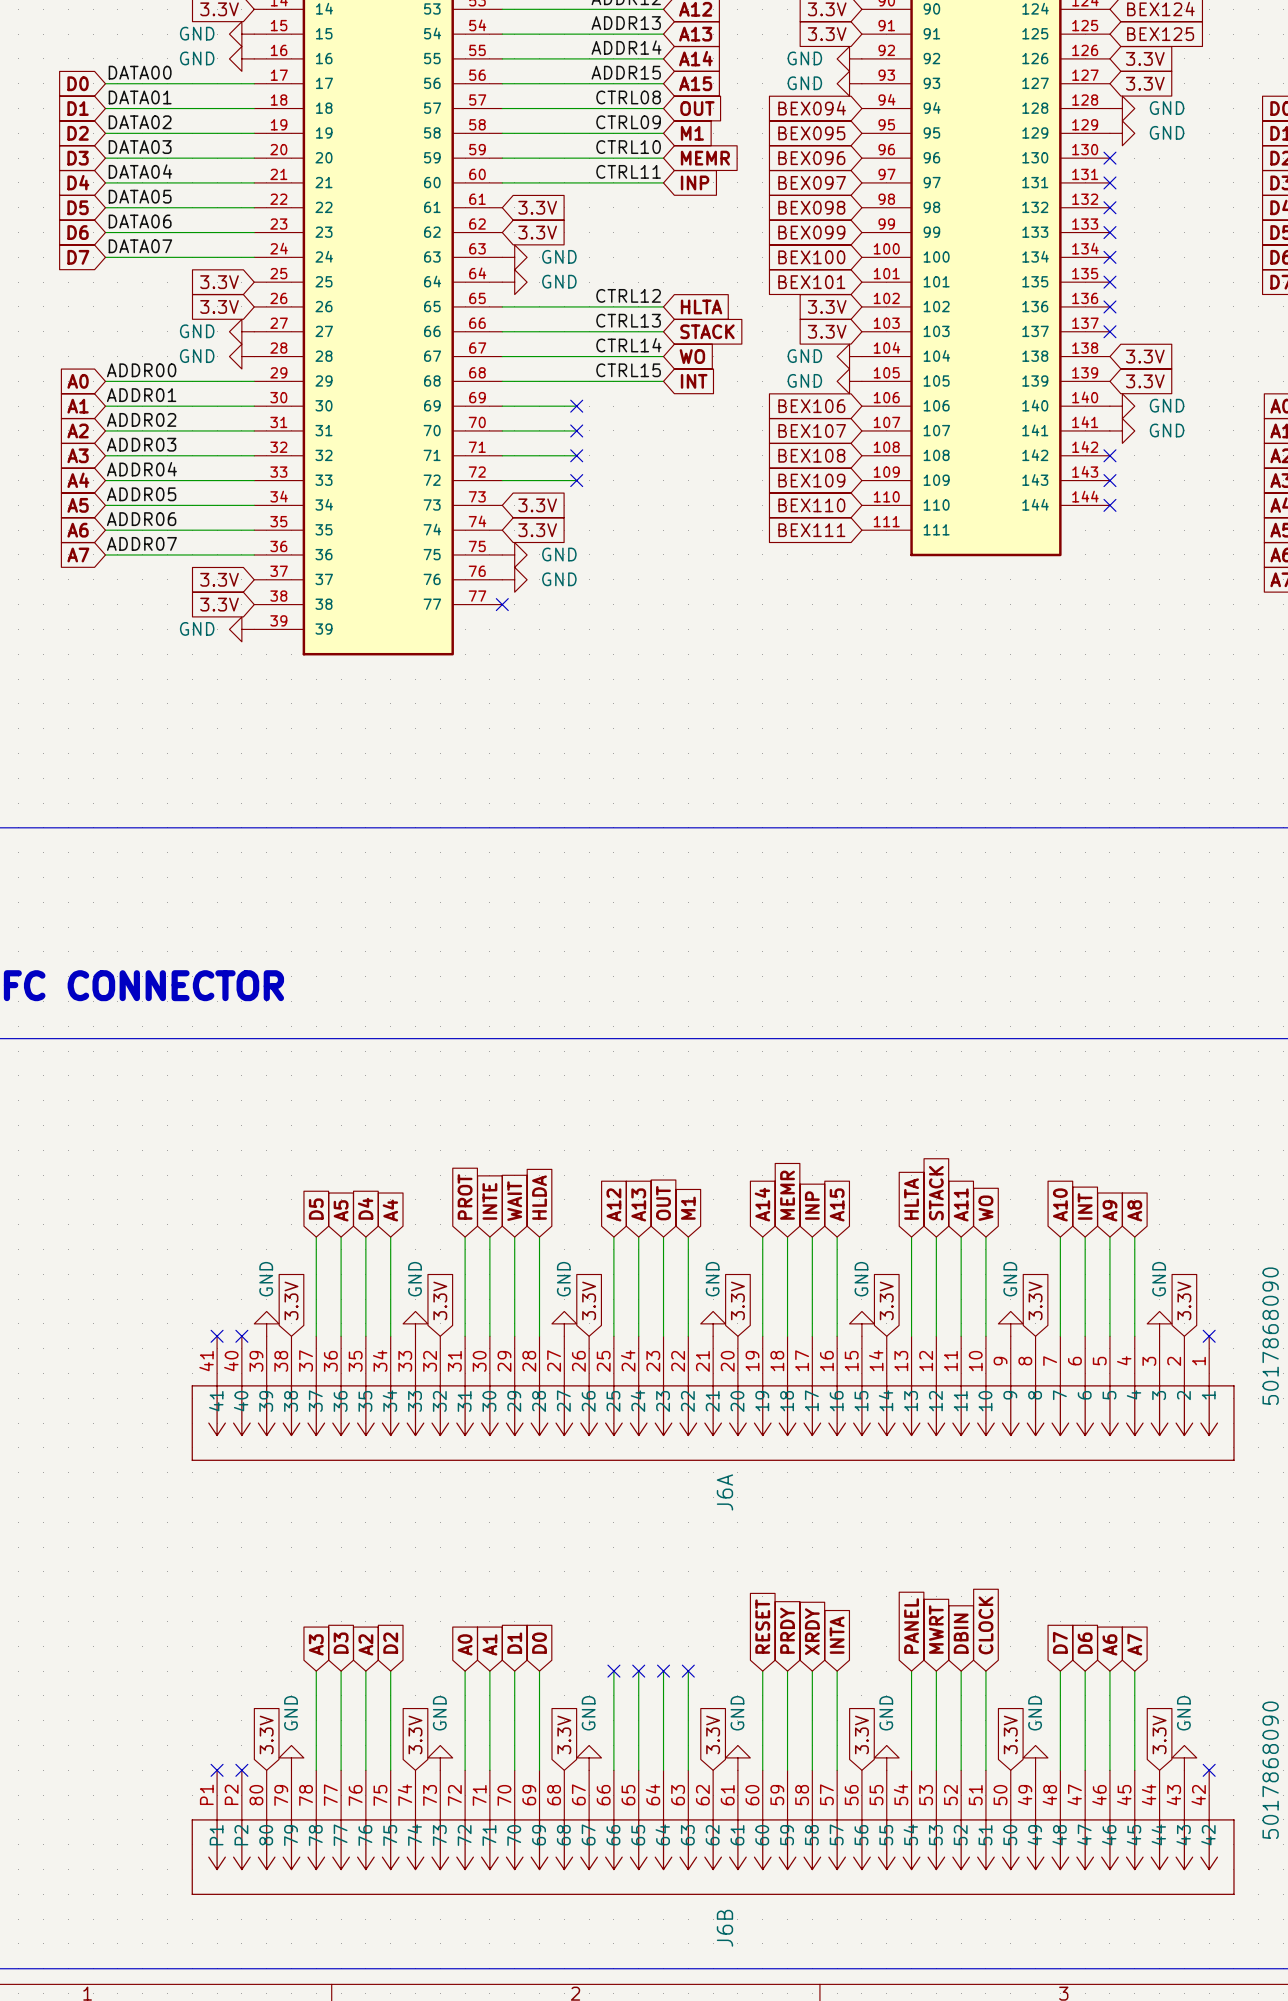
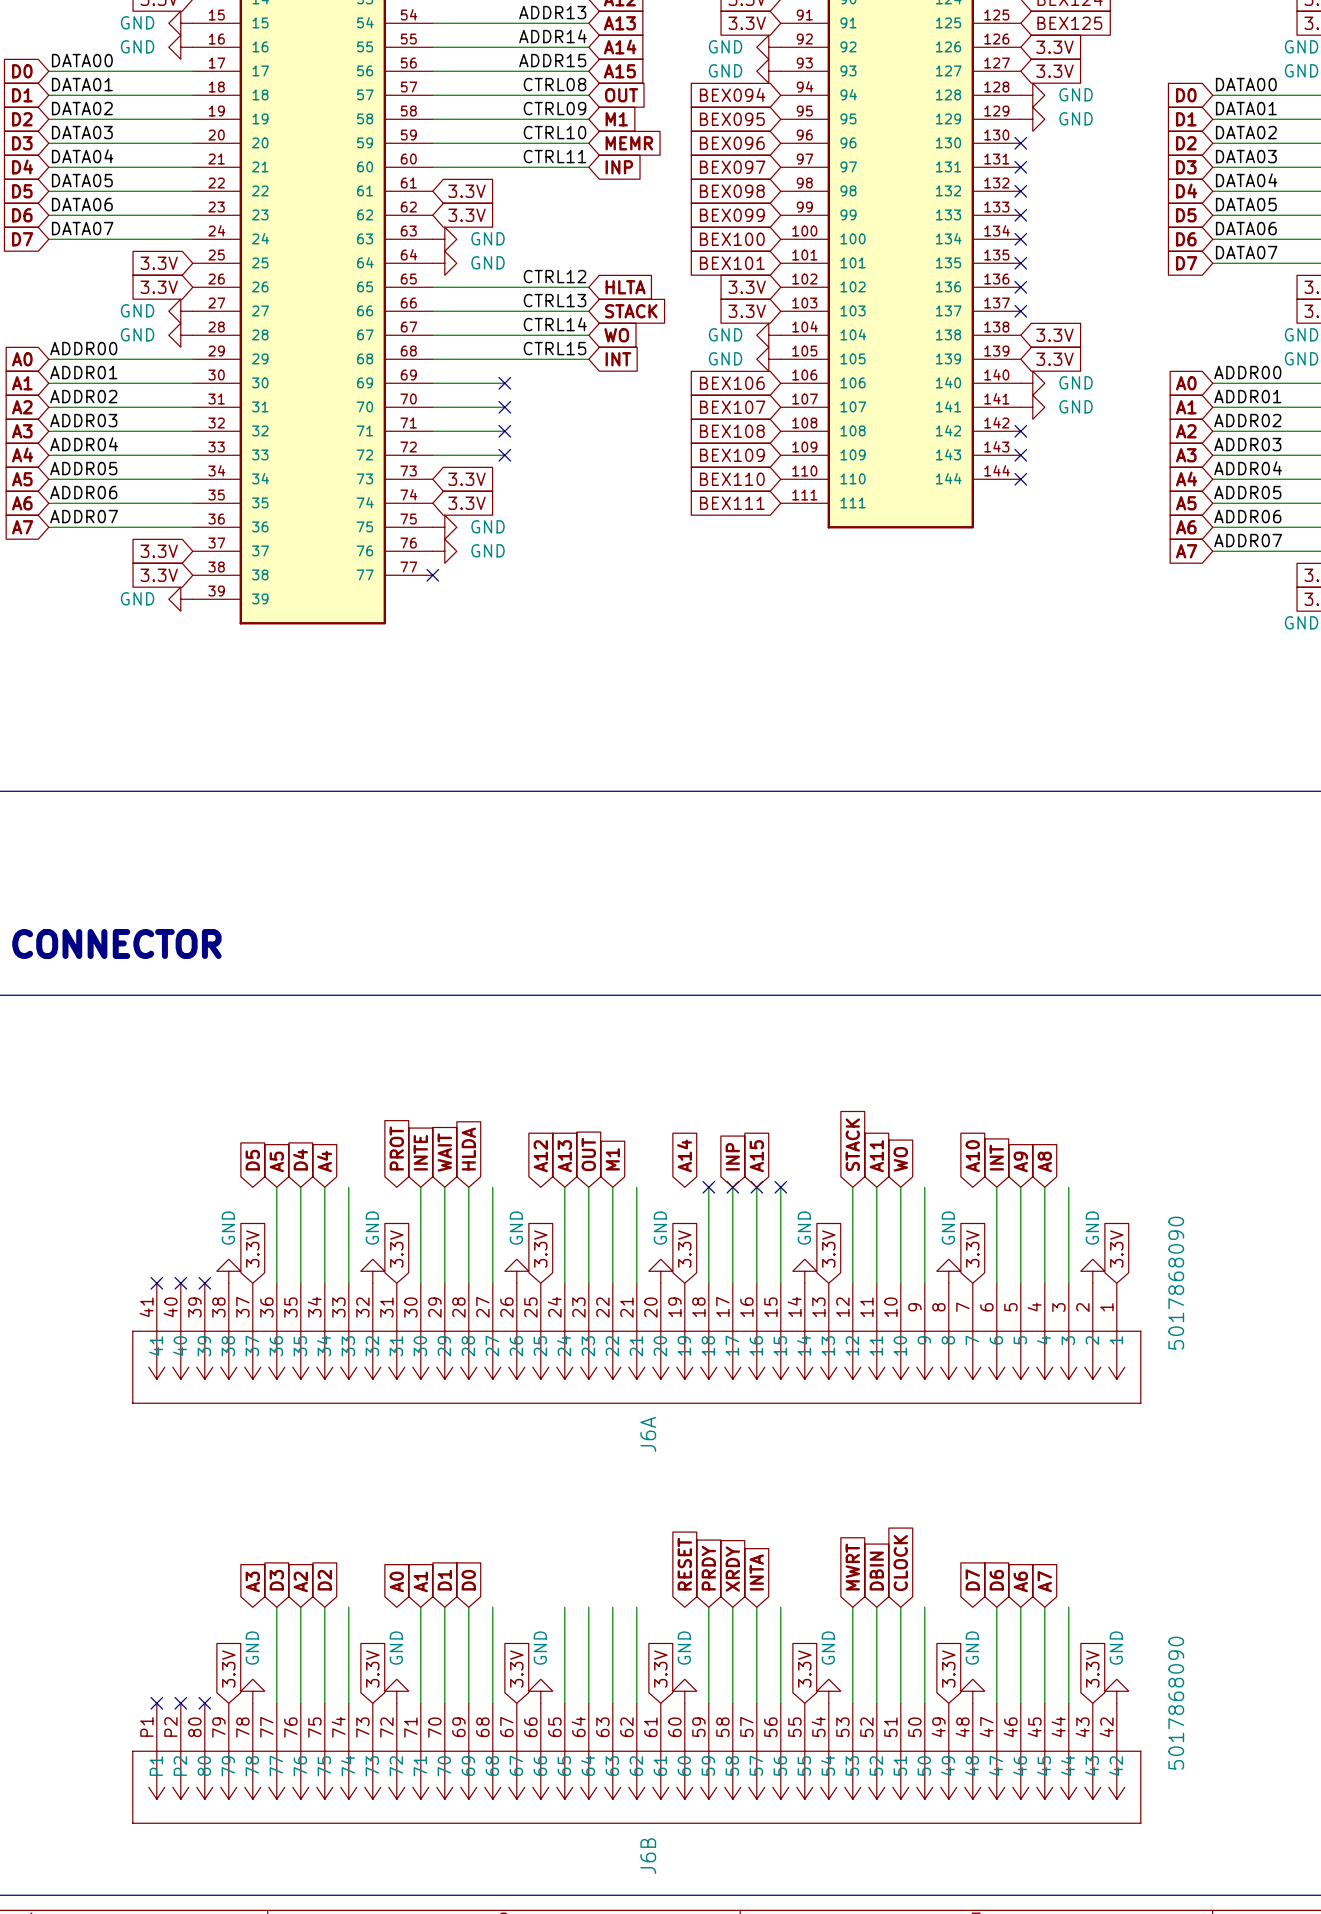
global label: MEMR (787, 1195) -> none
global label: HLTA (911, 1199) -> none
wire: (316, 1237) (316, 1336) -> (348, 1187) (348, 1283)
wire: (465, 1237) (465, 1336) -> (492, 1187) (492, 1283)
wire: (613, 1237) (613, 1336) -> (636, 1187) (636, 1283)
wire: (762, 1237) (762, 1336) -> (780, 1187) (780, 1283)
no-connect mark: none -> (708, 1187)
no-connect mark: none -> (732, 1187)
no-connect mark: none -> (756, 1187)
no-connect mark: none -> (780, 1187)
wire: (911, 1237) (911, 1336) -> (924, 1187) (924, 1283)
wire: (1060, 1237) (1060, 1336) -> (1068, 1187) (1068, 1283)
global label position: 3.3V (291, 1300) -> 3.3V (252, 1249)
global label position: 3.3V (440, 1300) -> 3.3V (396, 1249)
global label position: 3.3V (589, 1300) -> 3.3V (540, 1249)
global label position: 3.3V (737, 1300) -> 3.3V (684, 1249)
global label position: 3.3V (886, 1300) -> 3.3V (828, 1249)
global label position: 3.3V (1035, 1300) -> 3.3V (972, 1249)
global label position: 3.3V (1184, 1300) -> 3.3V (1116, 1249)
power symbol position: GND (266, 1323) -> GND (228, 1271)
power symbol position: GND (415, 1323) -> GND (372, 1271)
power symbol position: GND (564, 1323) -> GND (516, 1271)
power symbol position: GND (713, 1323) -> GND (660, 1271)
power symbol position: GND (861, 1323) -> GND (804, 1271)
power symbol position: GND (1010, 1323) -> GND (948, 1271)
power symbol position: GND (1159, 1323) -> GND (1092, 1271)
no-connect mark: none -> (204, 1283)
no-connect mark: (1209, 1336) -> none
global label: PANEL (911, 1626) -> none
wire: (316, 1671) (316, 1770) -> (348, 1607) (348, 1703)
wire: (465, 1671) (465, 1770) -> (492, 1607) (492, 1703)
wire: (613, 1671) (613, 1770) -> (636, 1607) (636, 1703)
no-connect mark: (613, 1671) -> none
no-connect mark: (638, 1671) -> none
no-connect mark: (663, 1671) -> none
no-connect mark: (688, 1671) -> none
wire: (762, 1671) (762, 1770) -> (780, 1607) (780, 1703)
wire: (911, 1671) (911, 1770) -> (924, 1607) (924, 1703)
wire: (1060, 1671) (1060, 1770) -> (1068, 1607) (1068, 1703)
global label position: 3.3V (266, 1734) -> 3.3V (228, 1669)
global label position: 3.3V (415, 1734) -> 3.3V (372, 1669)
global label position: 3.3V (564, 1734) -> 3.3V (516, 1669)
global label position: 3.3V (713, 1734) -> 3.3V (660, 1669)
global label position: 3.3V (861, 1734) -> 3.3V (804, 1669)
global label position: 3.3V (1010, 1734) -> 3.3V (948, 1669)
global label position: 3.3V (1159, 1734) -> 3.3V (1092, 1669)
power symbol position: GND (291, 1757) -> GND (252, 1691)
power symbol position: GND (440, 1757) -> GND (396, 1691)
power symbol position: GND (589, 1757) -> GND (540, 1691)
power symbol position: GND (737, 1757) -> GND (684, 1691)
power symbol position: GND (886, 1757) -> GND (828, 1691)
power symbol position: GND (1035, 1757) -> GND (972, 1691)
power symbol position: GND (1184, 1757) -> GND (1116, 1691)
no-connect mark: none -> (204, 1703)
no-connect mark: (1209, 1770) -> none

